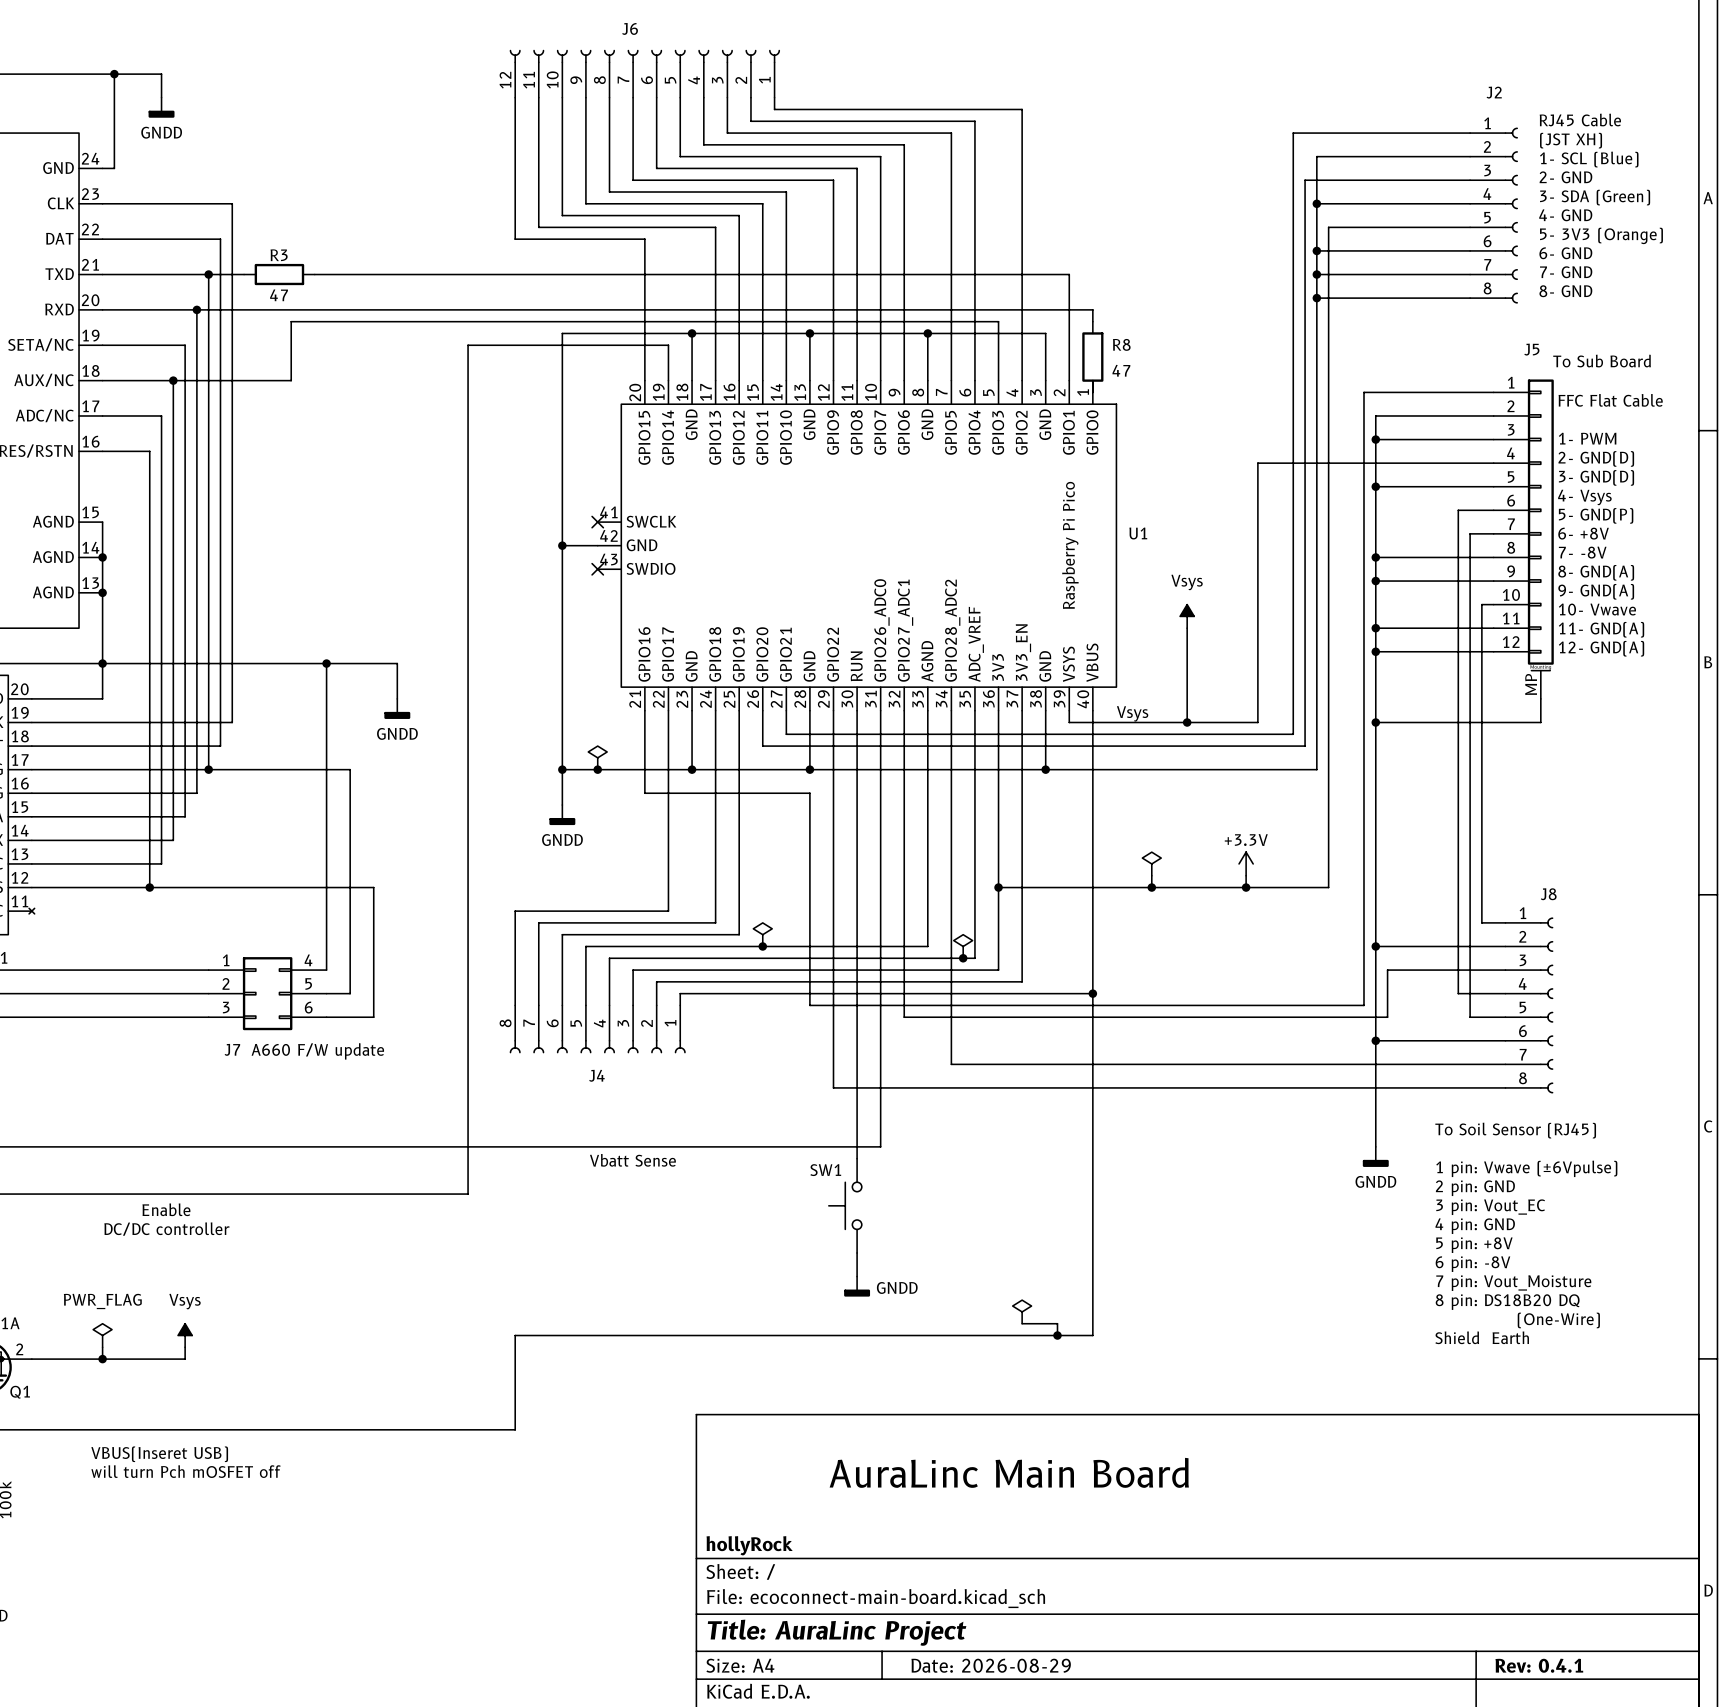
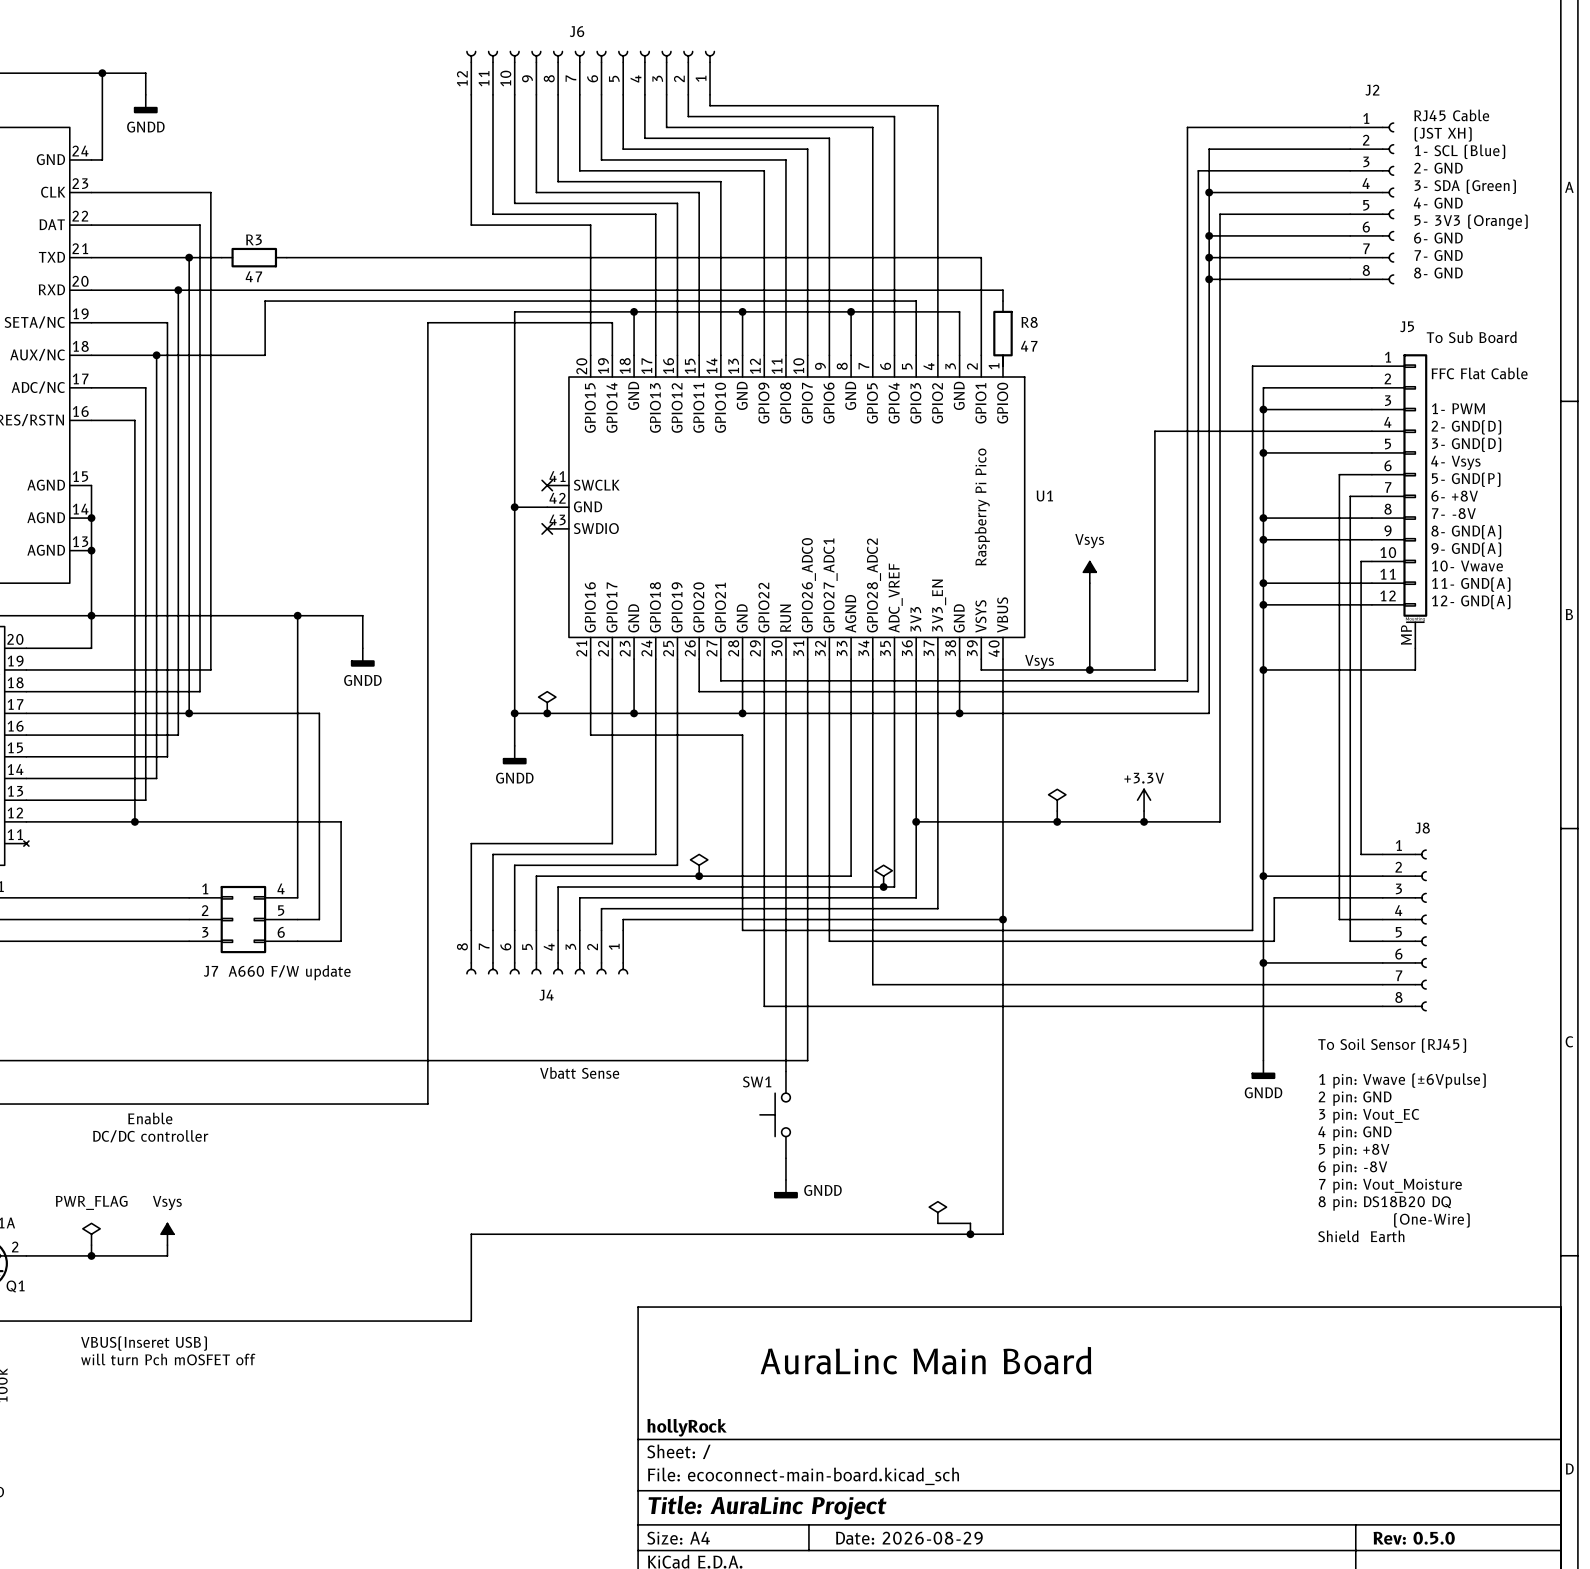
title block: Rev: 0.4.1 (1539, 1665) -> Rev: 0.5.0 (1414, 1538)

